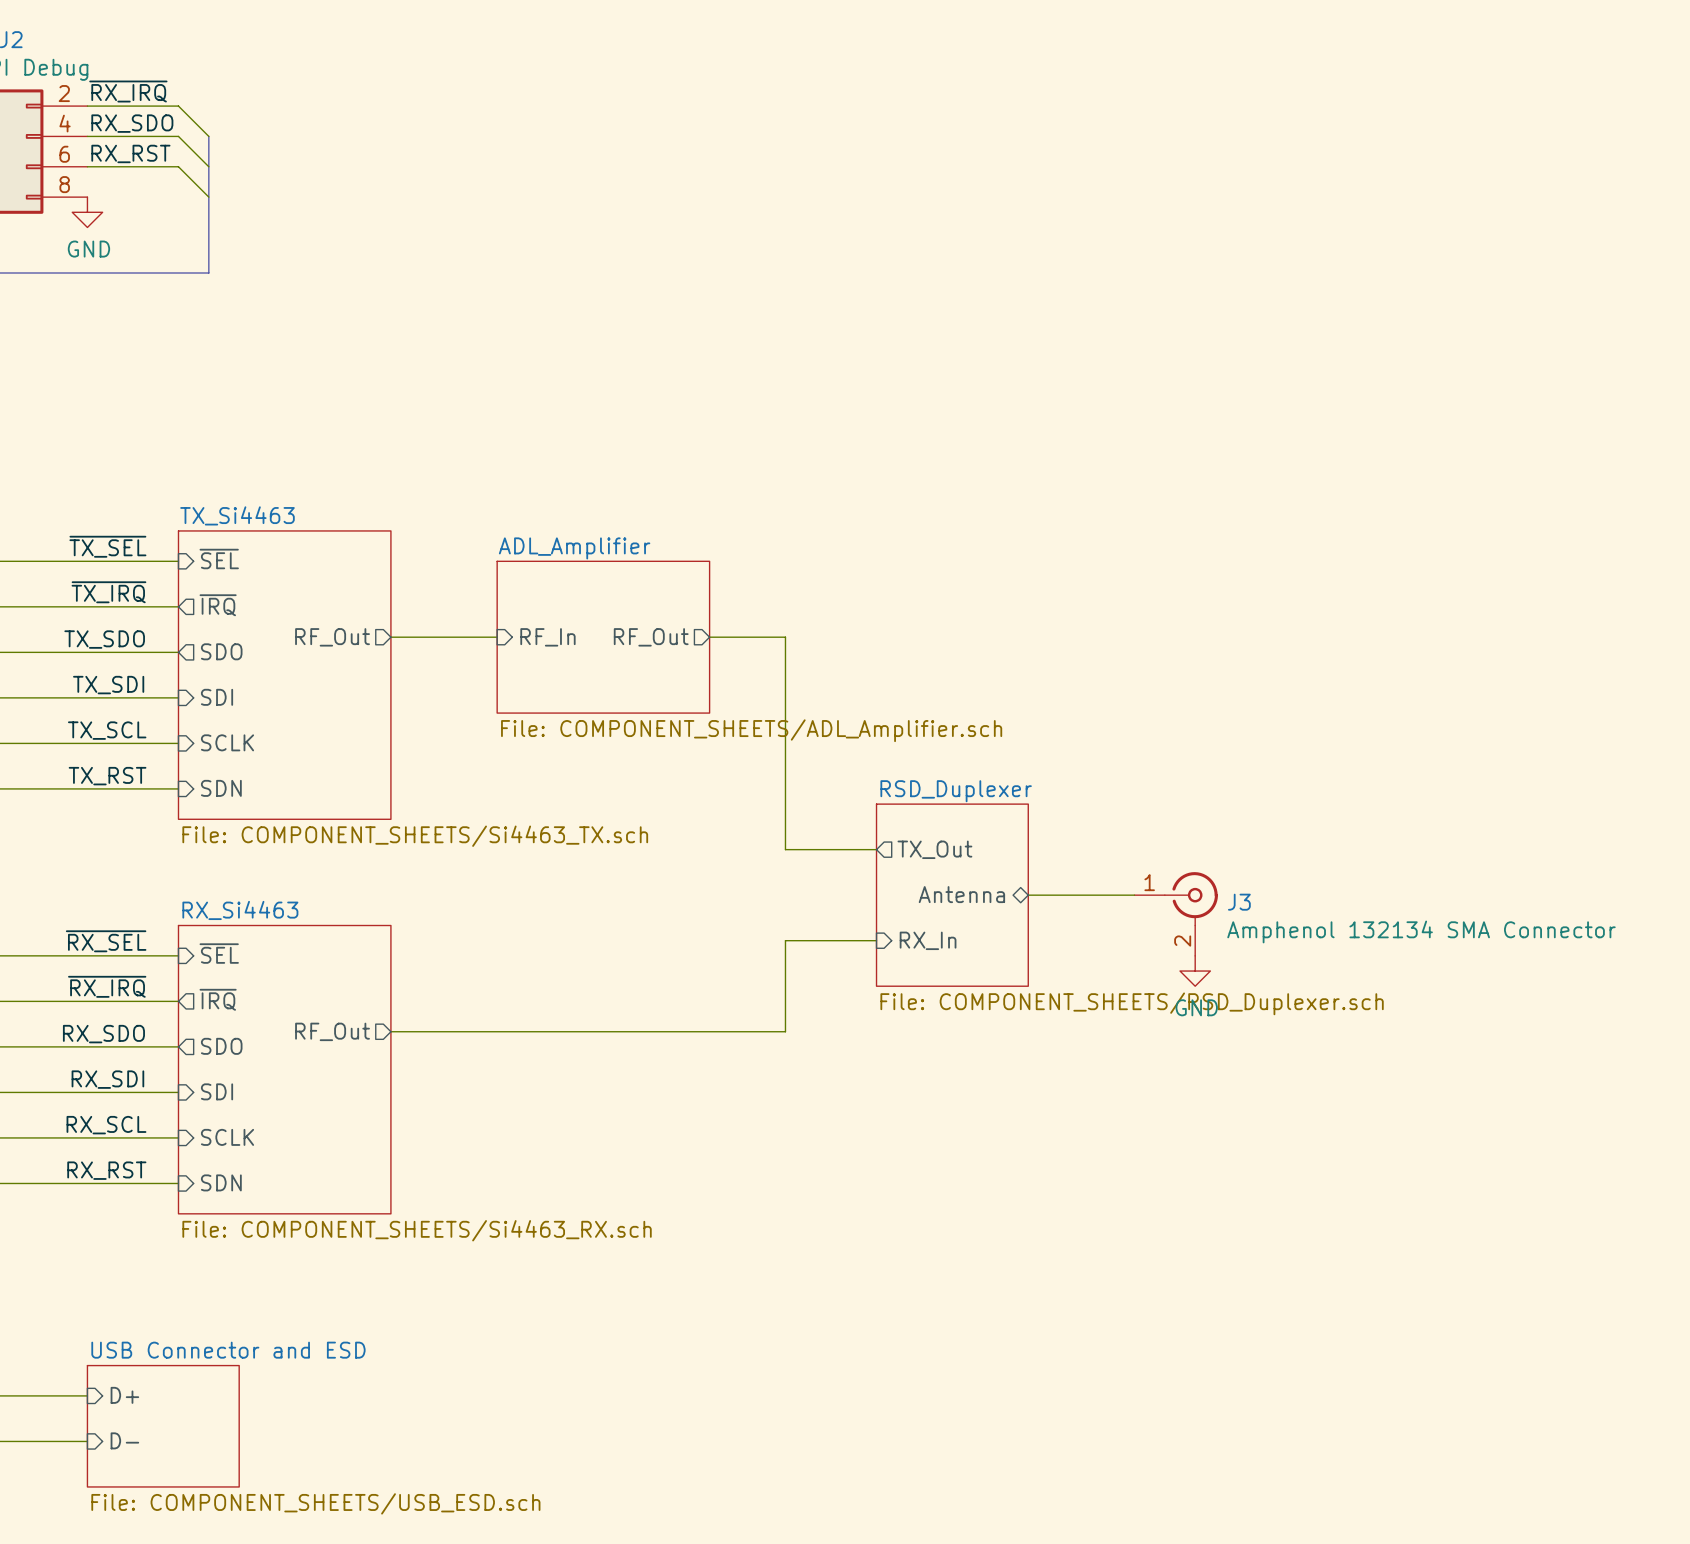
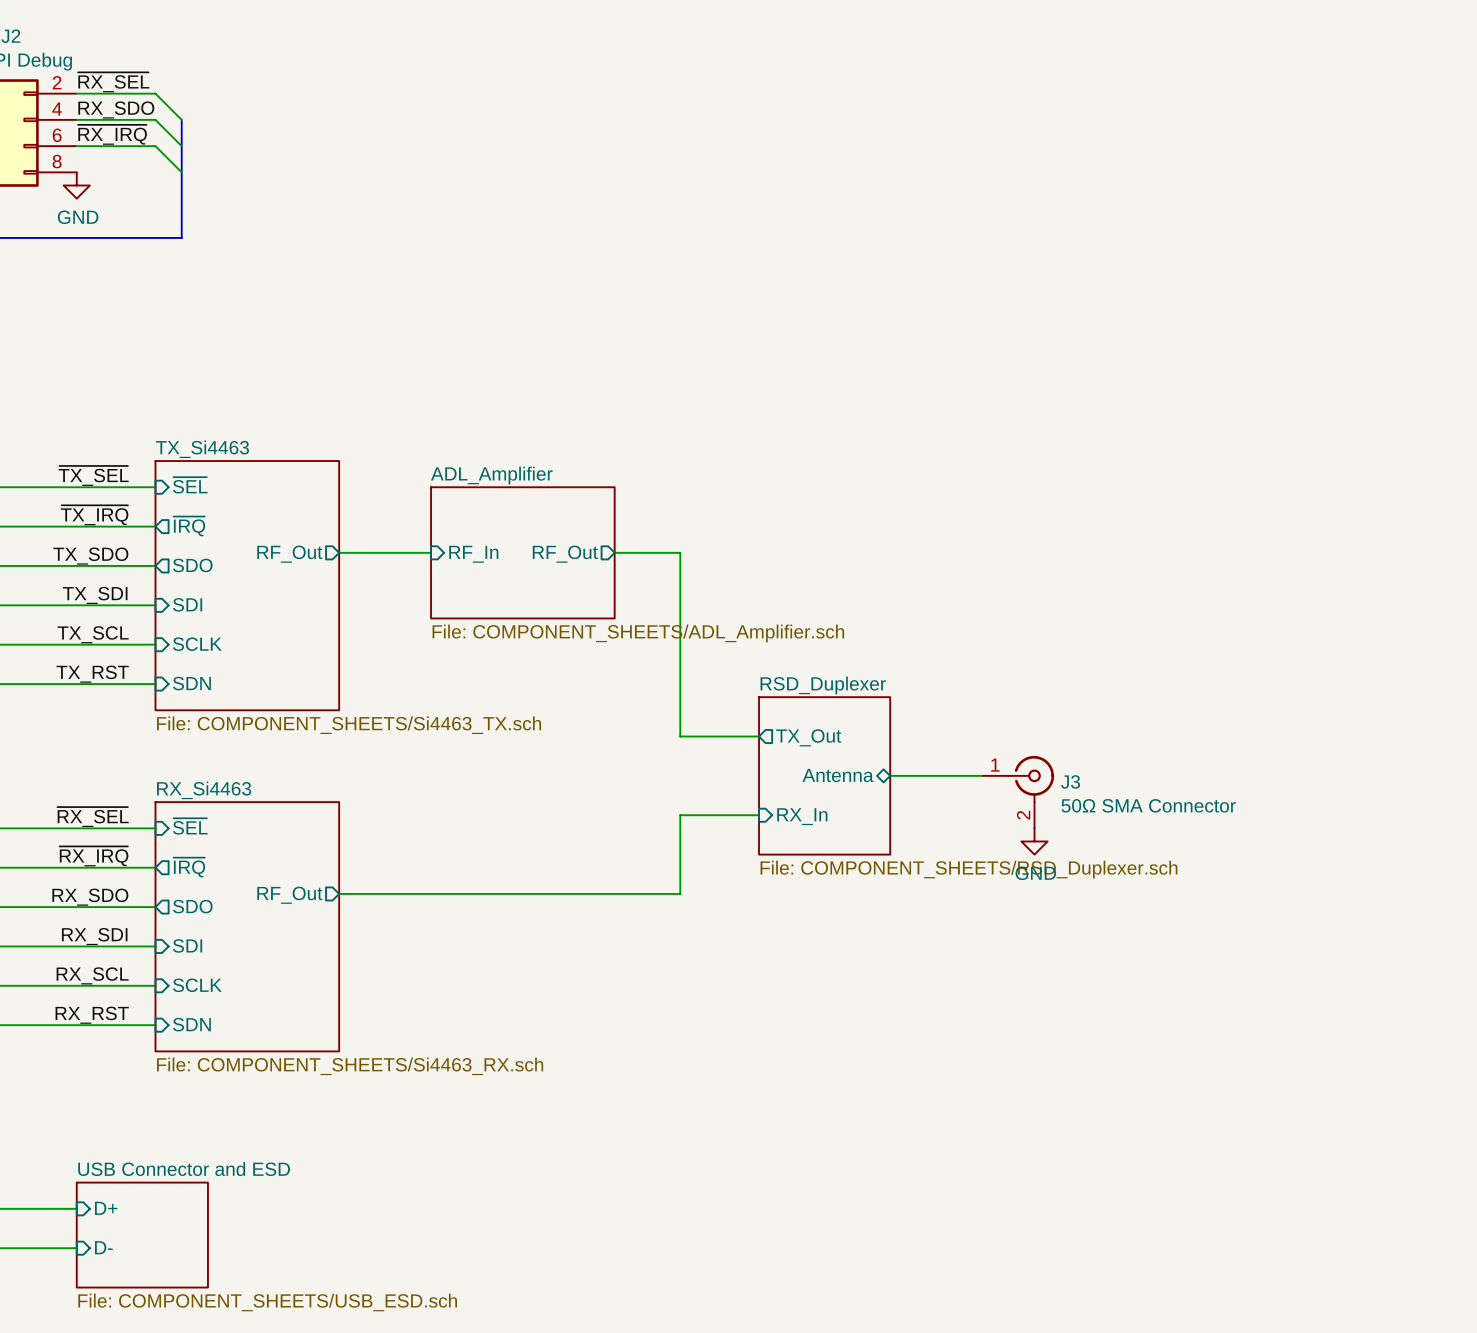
label: ~{RX_IRQ} (128, 91) -> ~{RX_SEL} (113, 82)
label: RX_RST (130, 153) -> ~{RX_IRQ} (112, 134)
J3 value: Amphenol 132134 SMA Connector (1421, 931) -> 50Ω SMA Connector (1148, 805)

